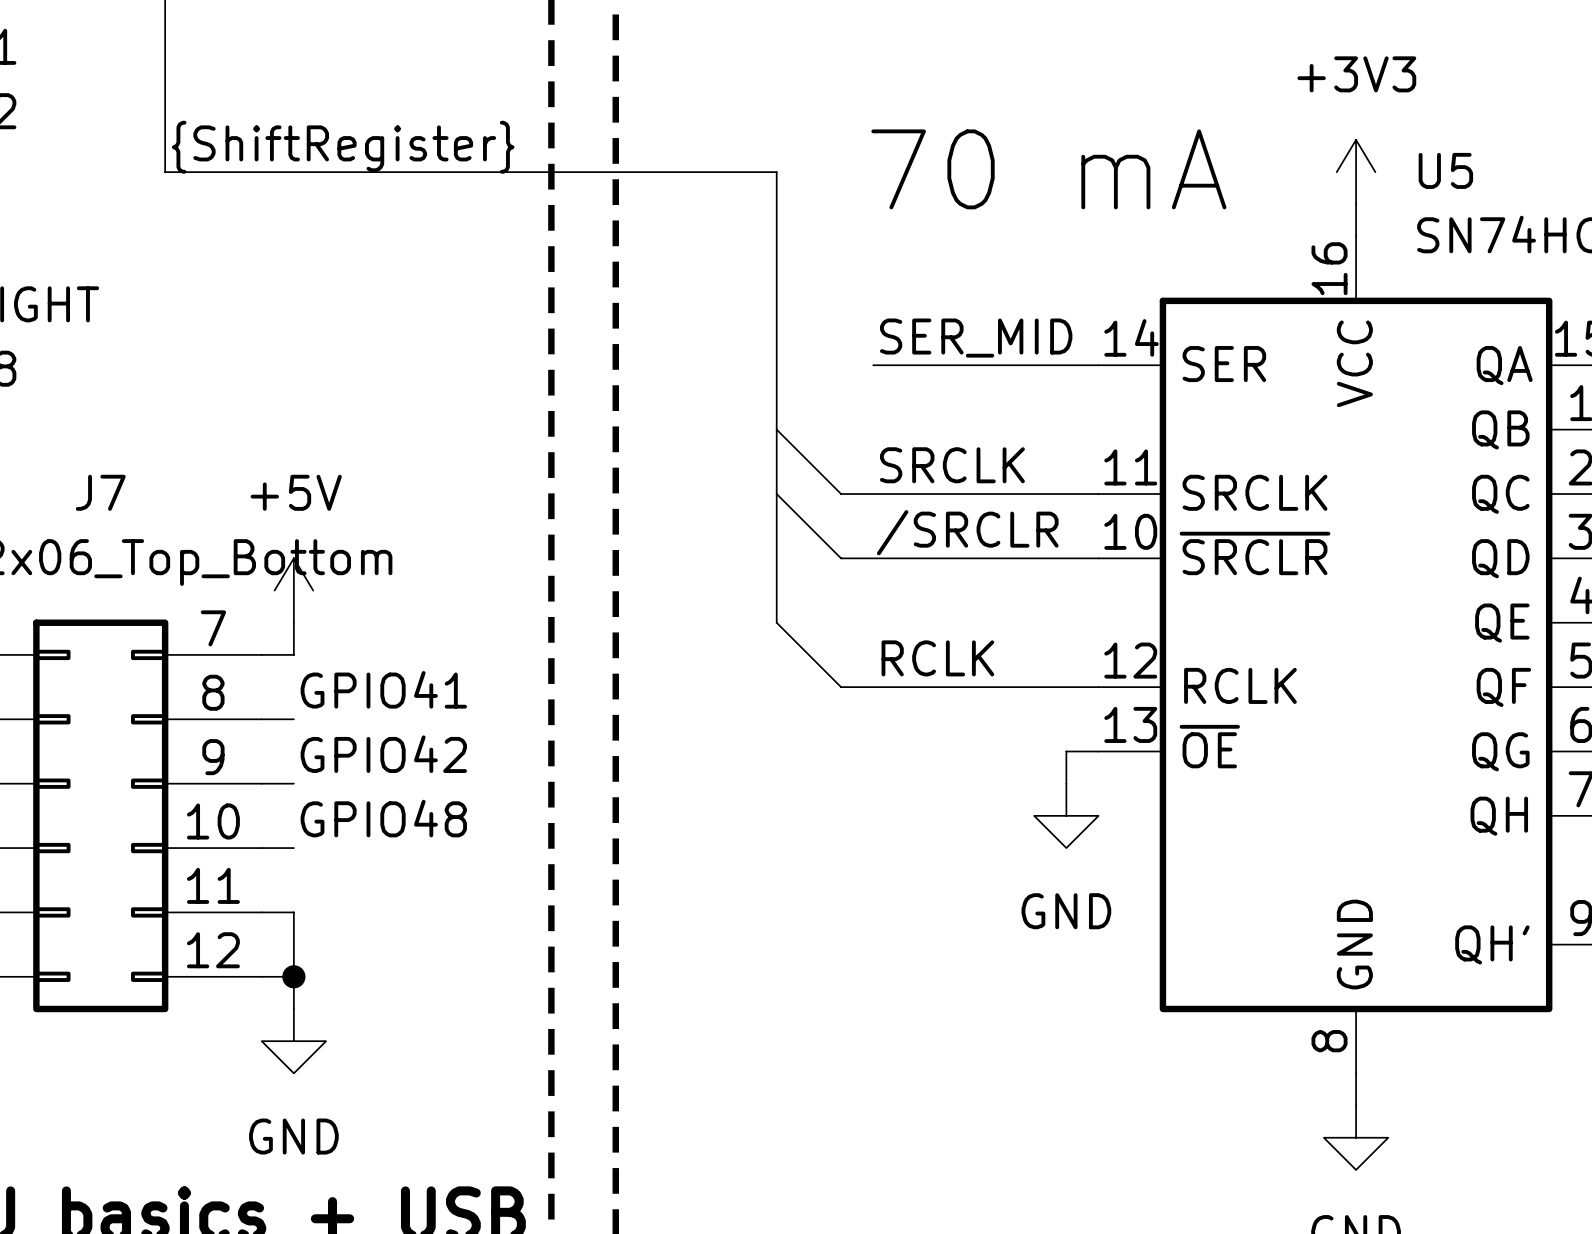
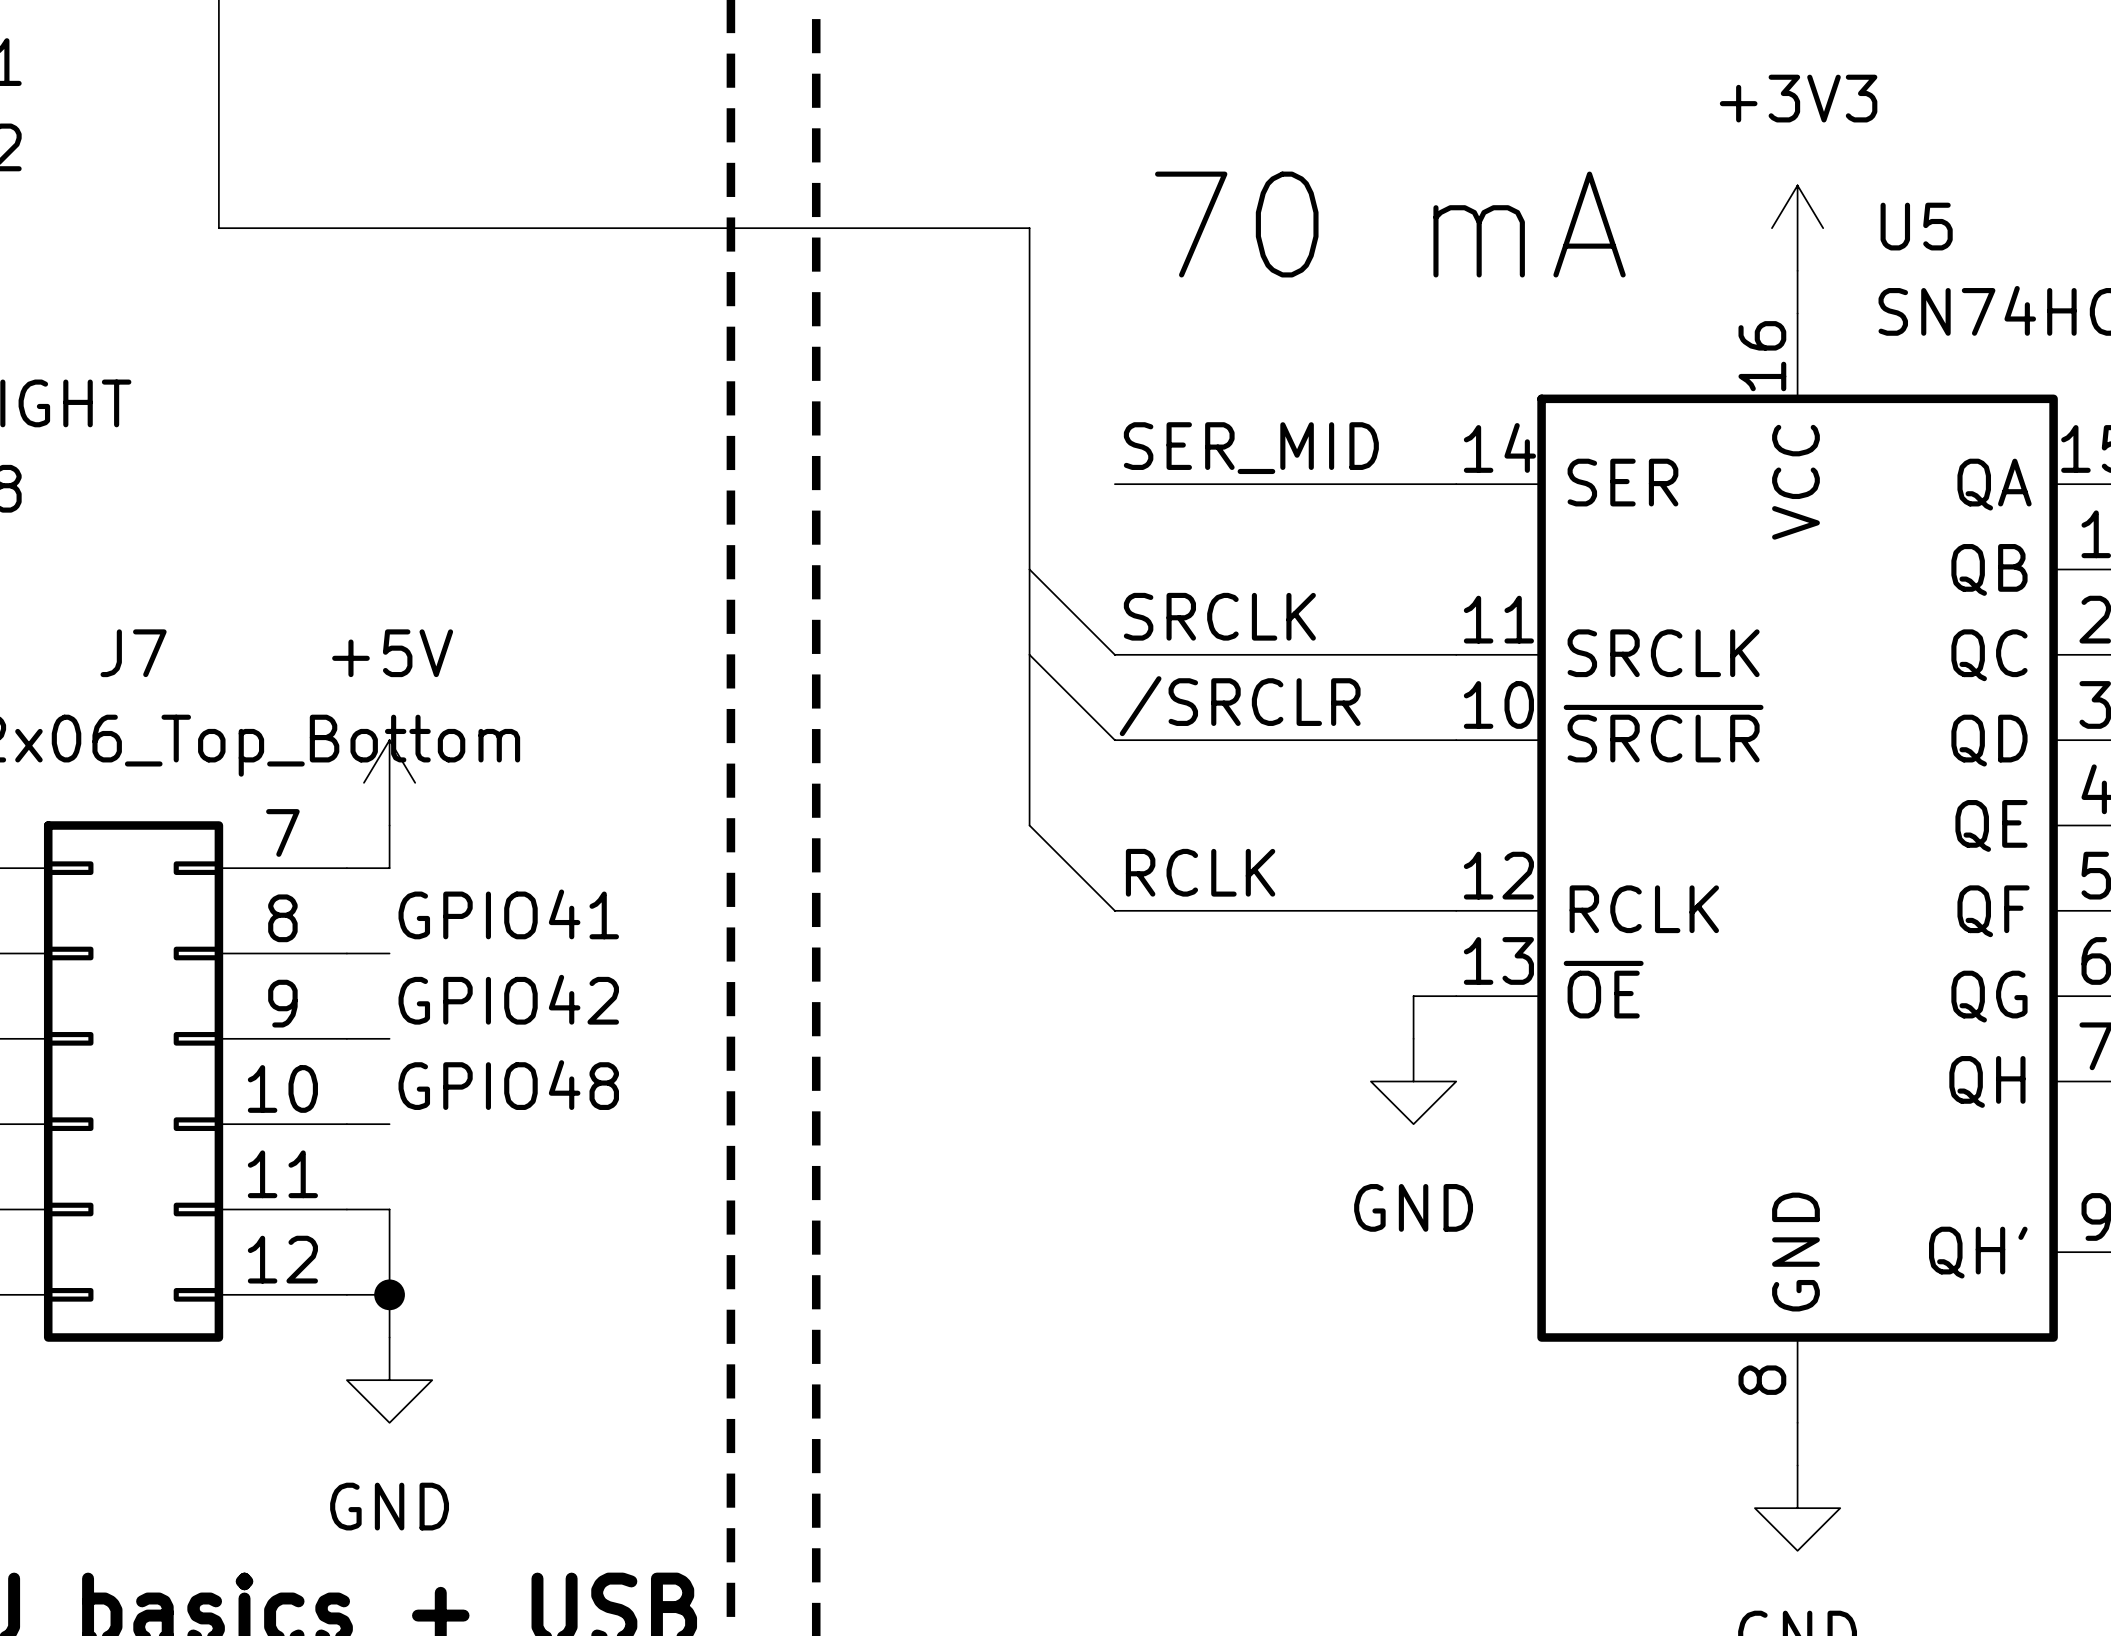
label: {ShiftRegister} (343, 147) -> none
label position: SER_MID (976, 338) -> SER_MID (1251, 448)
wire: none -> (1114, 484) (1157, 484)
label position: SRCLK (952, 465) -> SRCLK (1219, 616)
label position: /SRCLR (967, 532) -> /SRCLR (1240, 706)
label position: RCLK (937, 658) -> RCLK (1200, 872)

